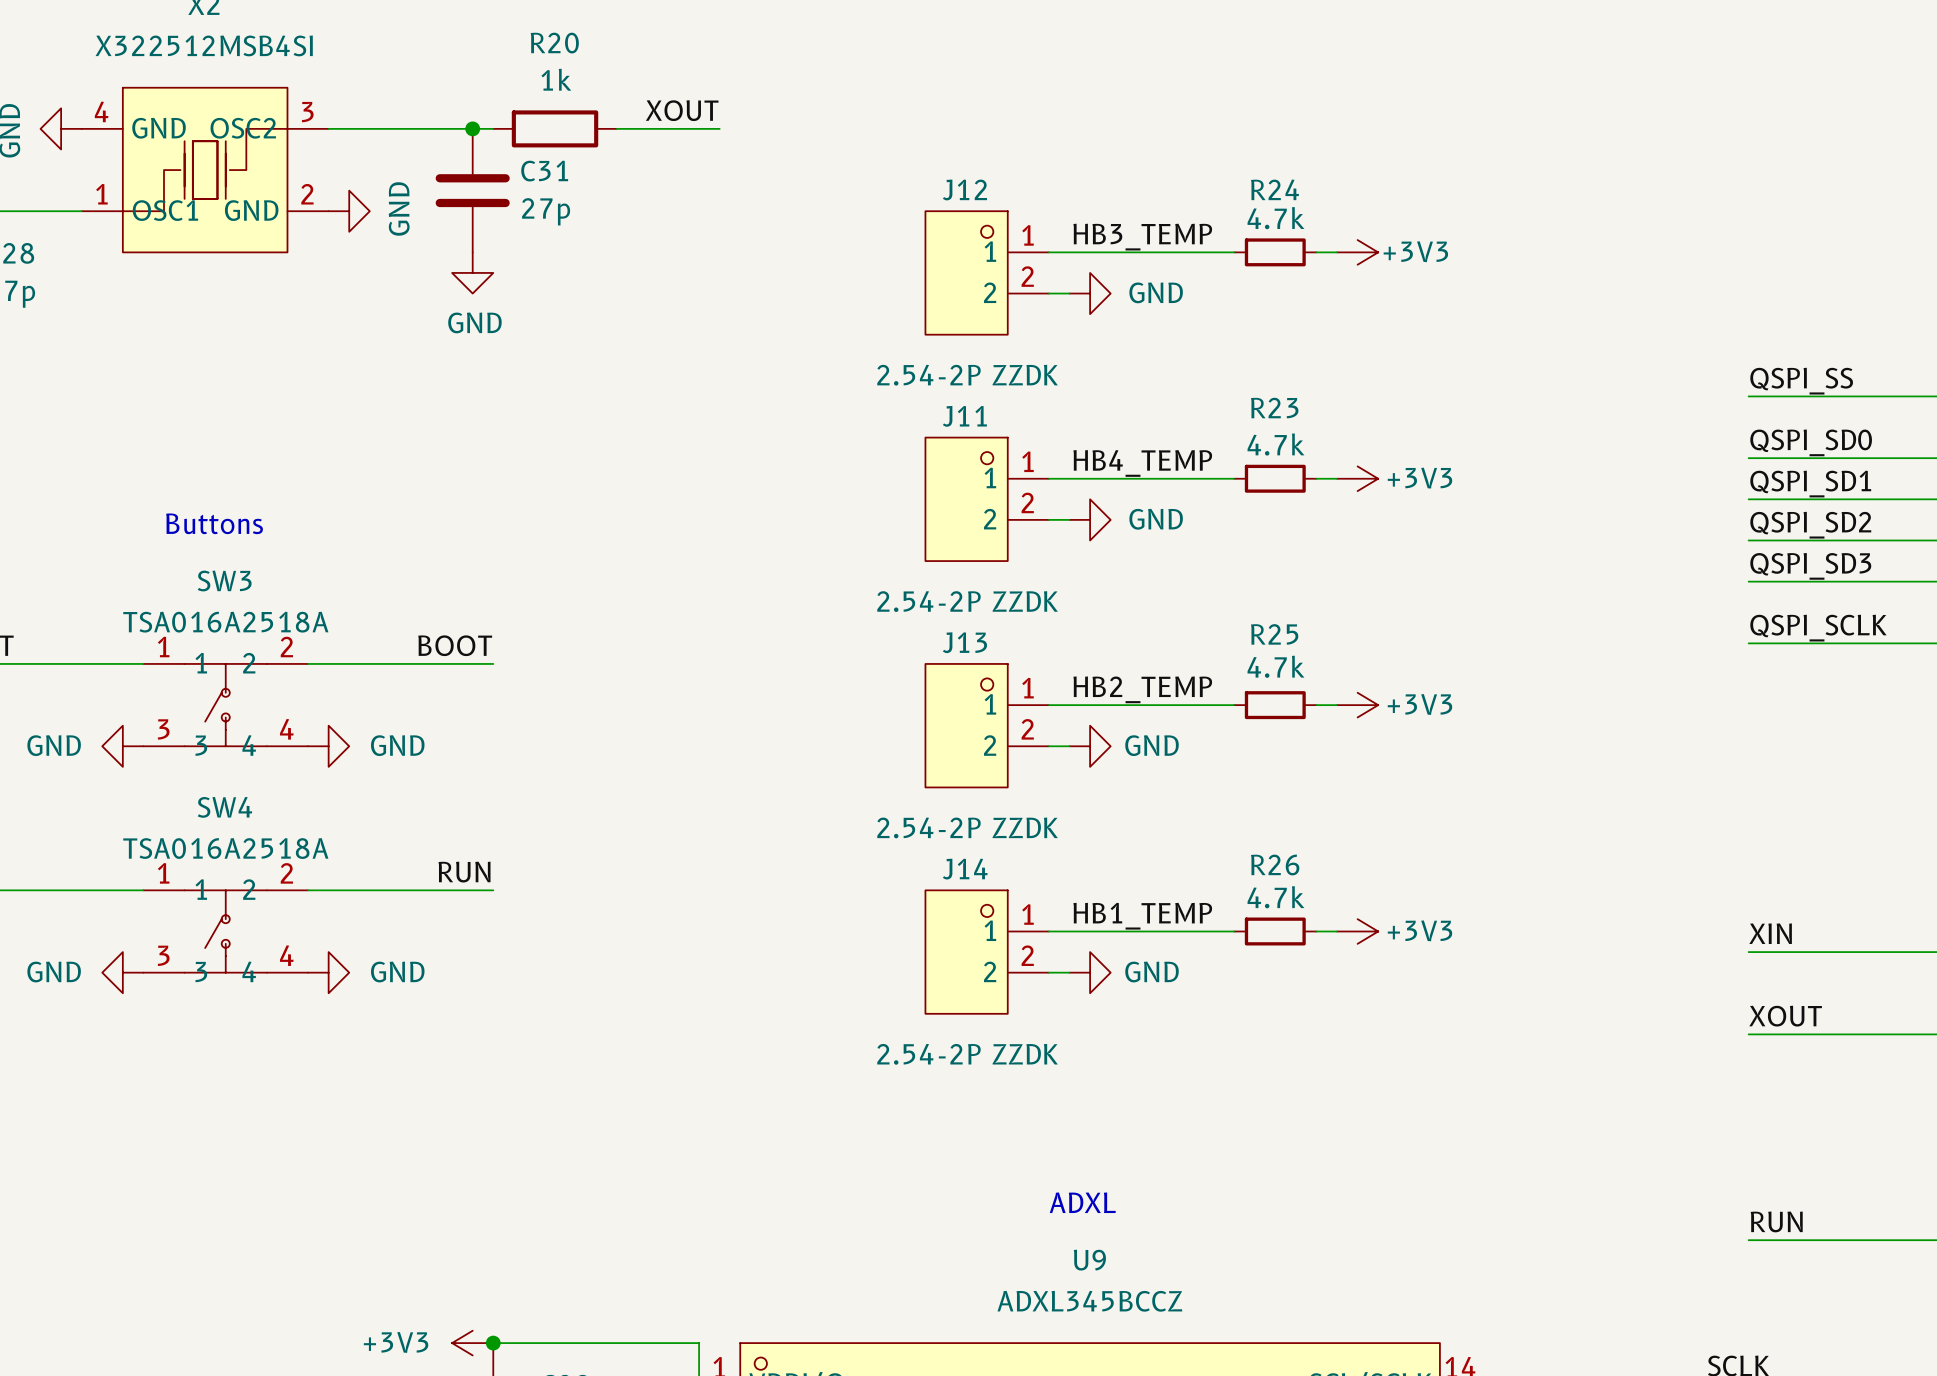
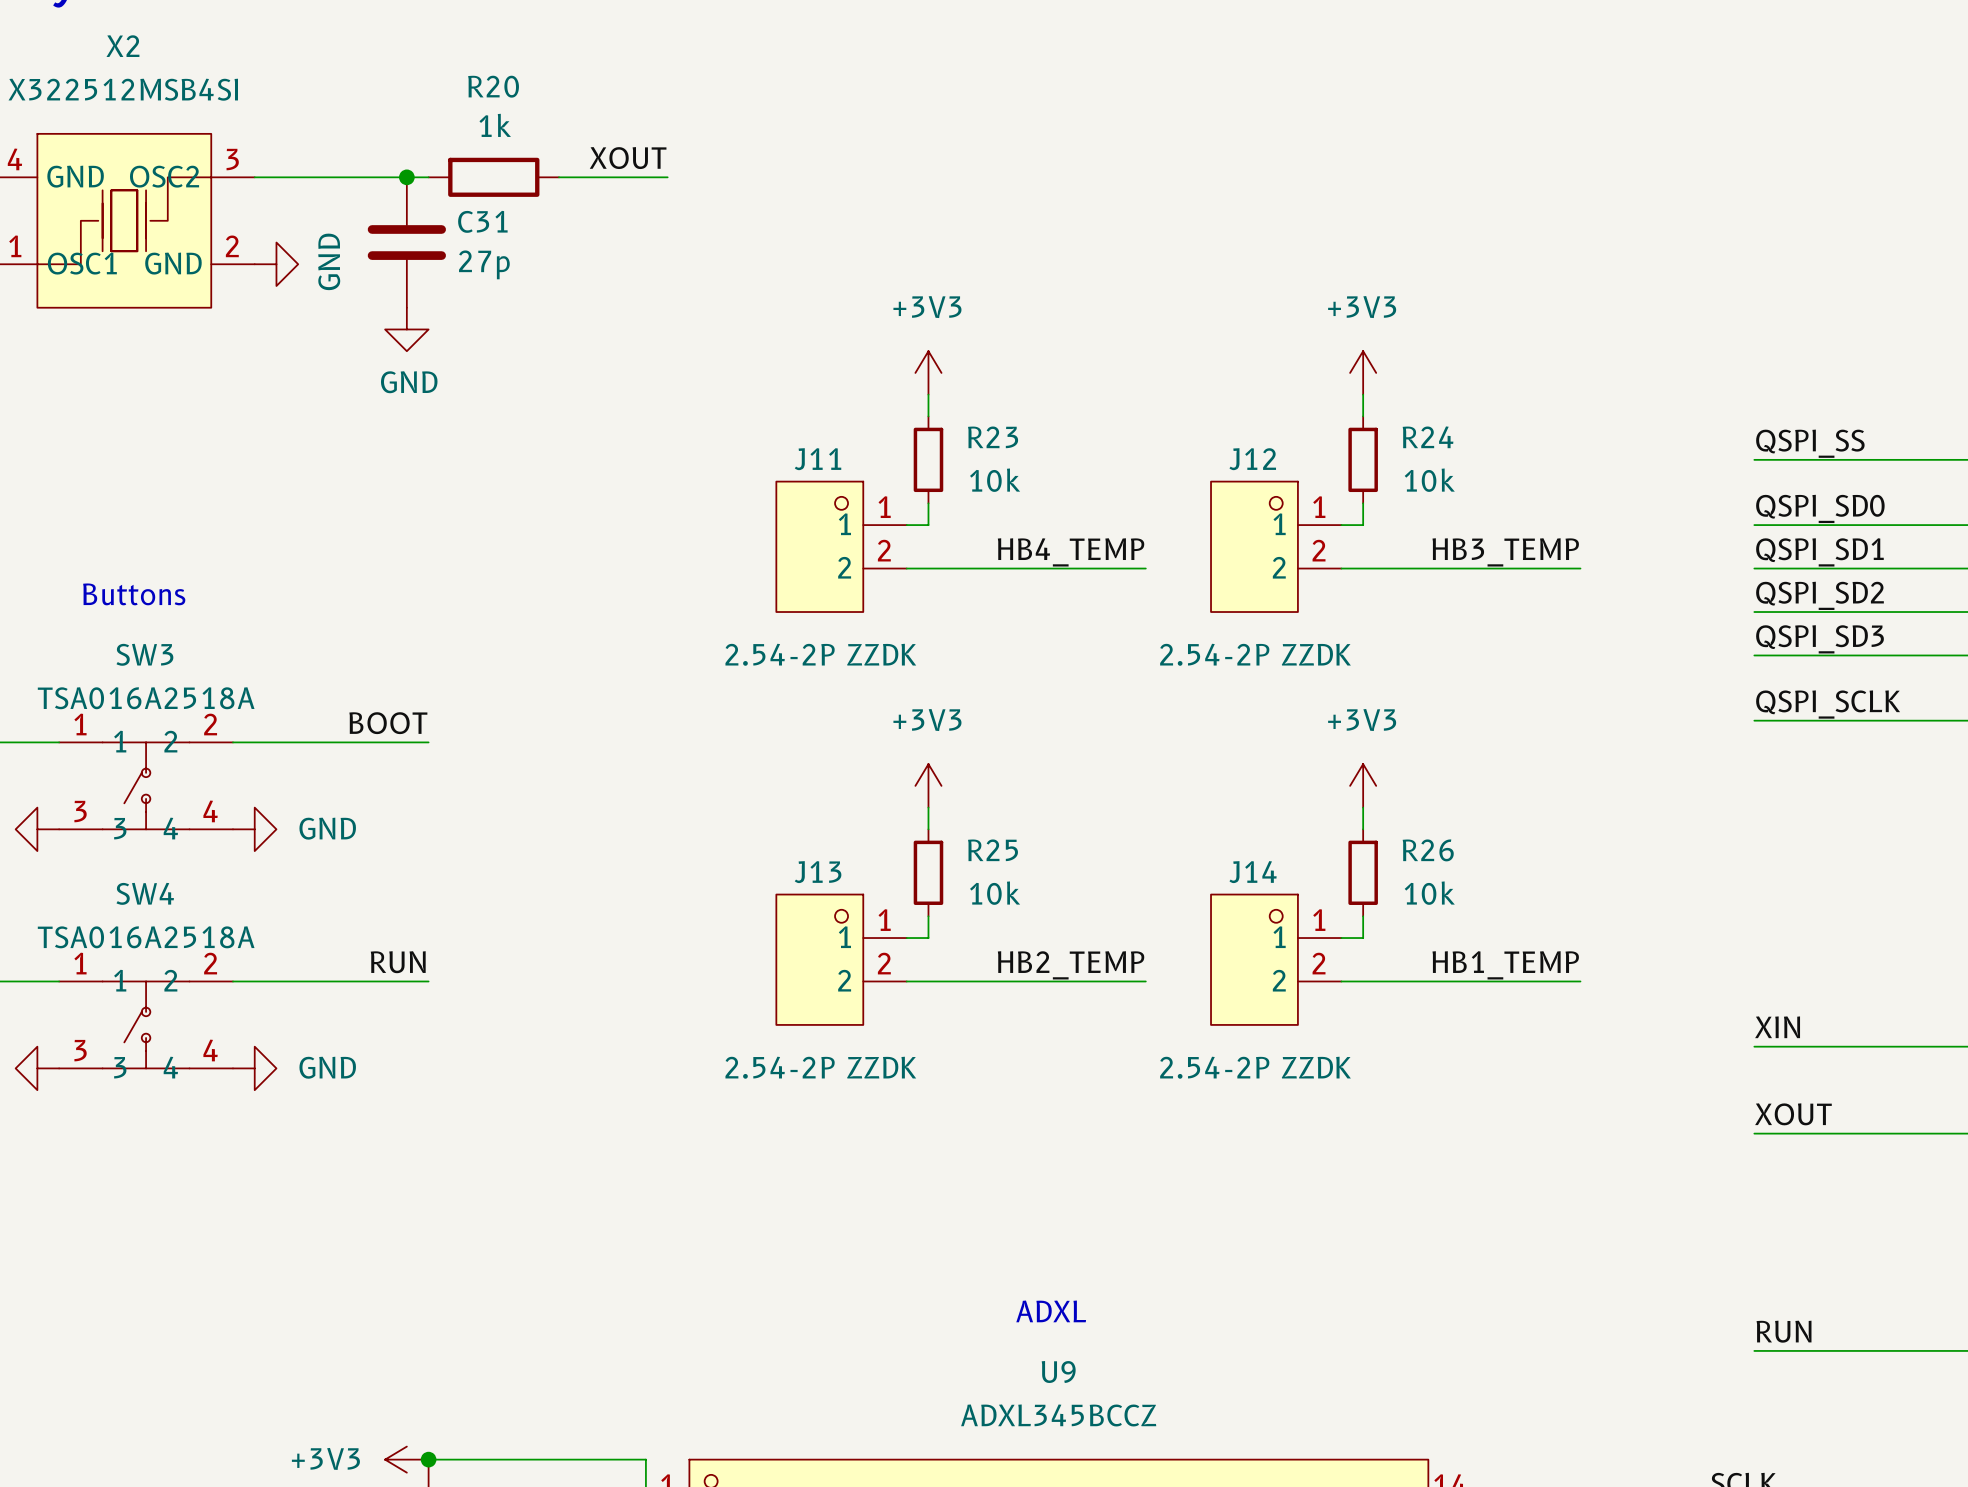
R24 value: 4.7k (1275, 218) -> 10k (1429, 480)
label: HB3_TEMP (1142, 237) -> none
wire: (1048, 252) (1234, 252) -> none
R24 rotation: 0° (1275, 252) -> 90° clockwise (1363, 459)
R24 position: (1275, 252) -> (1363, 459)
wire: (1316, 252) (1337, 252) -> none
power symbol rotation: 0° (1357, 252) -> 90° counterclockwise (1363, 372)
power symbol position: +3V3 (1357, 252) -> +3V3 (1363, 372)
J12 position: (987, 272) -> (1276, 546)
wire: (1048, 293) (1069, 293) -> none
power symbol: GND (1090, 293) -> none
power symbol: none -> +3V3 (928, 372)
wire: none -> (928, 394) (928, 416)
wire: none -> (1363, 394) (1363, 416)
wire: none -> (1363, 503) (1363, 525) (1341, 525)
R23 value: 4.7k (1275, 444) -> 10k (995, 480)
label position: HB4_TEMP (1142, 463) -> HB4_TEMP (1071, 552)
wire: (1048, 478) (1234, 478) -> none
R23 rotation: 0° (1275, 478) -> 90° clockwise (928, 459)
R23 position: (1275, 478) -> (928, 459)
wire: (1316, 478) (1337, 478) -> none
power symbol: +3V3 (1357, 478) -> none
label: none -> HB3_TEMP (1505, 552)
wire: none -> (906, 568) (1145, 568)
J11 position: (987, 499) -> (841, 546)
wire: none -> (1341, 568) (1580, 568)
wire: (1048, 519) (1069, 519) -> none
power symbol: GND (1090, 519) -> none
R25 value: 4.7k (1275, 666) -> 10k (995, 893)
label position: HB2_TEMP (1142, 689) -> HB2_TEMP (1071, 965)
power symbol: none -> +3V3 (928, 785)
wire: (1048, 705) (1234, 705) -> none
R25 rotation: 0° (1275, 705) -> 90° clockwise (928, 872)
R25 position: (1275, 705) -> (928, 872)
wire: (1316, 705) (1337, 705) -> none
power symbol rotation: 0° (1357, 705) -> 90° counterclockwise (1363, 785)
J13 position: (987, 725) -> (841, 959)
wire: none -> (1363, 807) (1363, 829)
wire: (1048, 746) (1069, 746) -> none
power symbol: GND (1090, 746) -> none
wire: none -> (928, 916) (928, 938) (906, 938)
wire: none -> (1363, 916) (1363, 938) (1341, 938)
wire: none -> (906, 981) (1145, 981)
wire: none -> (1341, 981) (1580, 981)
R26 value: 4.7k (1275, 897) -> 10k (1429, 893)
label position: HB1_TEMP (1142, 916) -> HB1_TEMP (1505, 965)
wire: (1048, 931) (1234, 931) -> none
R26 rotation: 0° (1275, 931) -> 90° clockwise (1363, 872)
R26 position: (1275, 931) -> (1363, 872)
wire: (1316, 931) (1337, 931) -> none
power symbol: +3V3 (1357, 931) -> none
J14 position: (987, 952) -> (1276, 959)
wire: (1048, 972) (1069, 972) -> none
power symbol: GND (1090, 972) -> none

